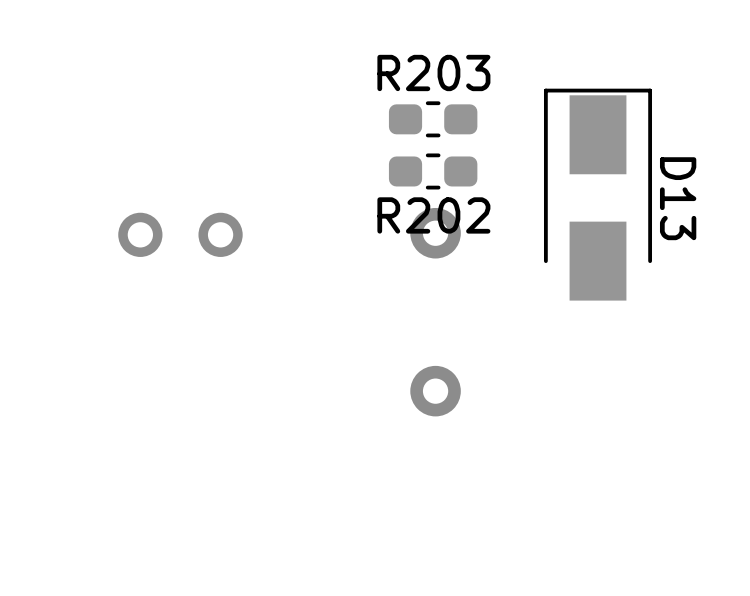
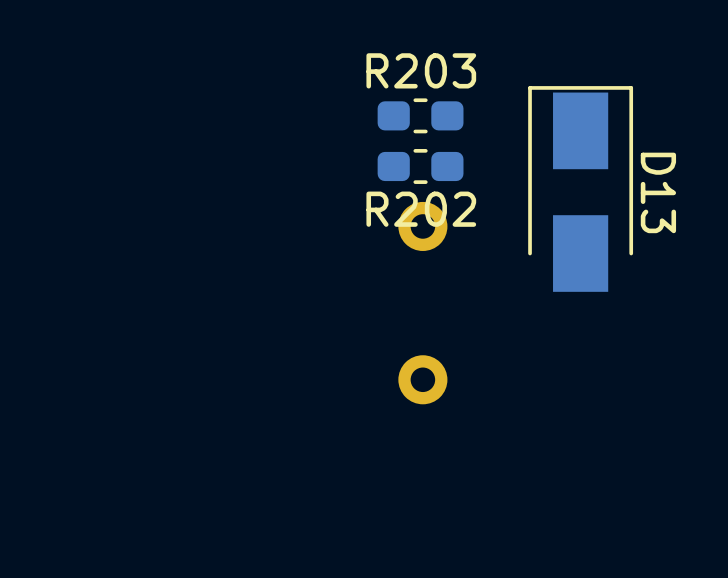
part: (180, 234) -> none

